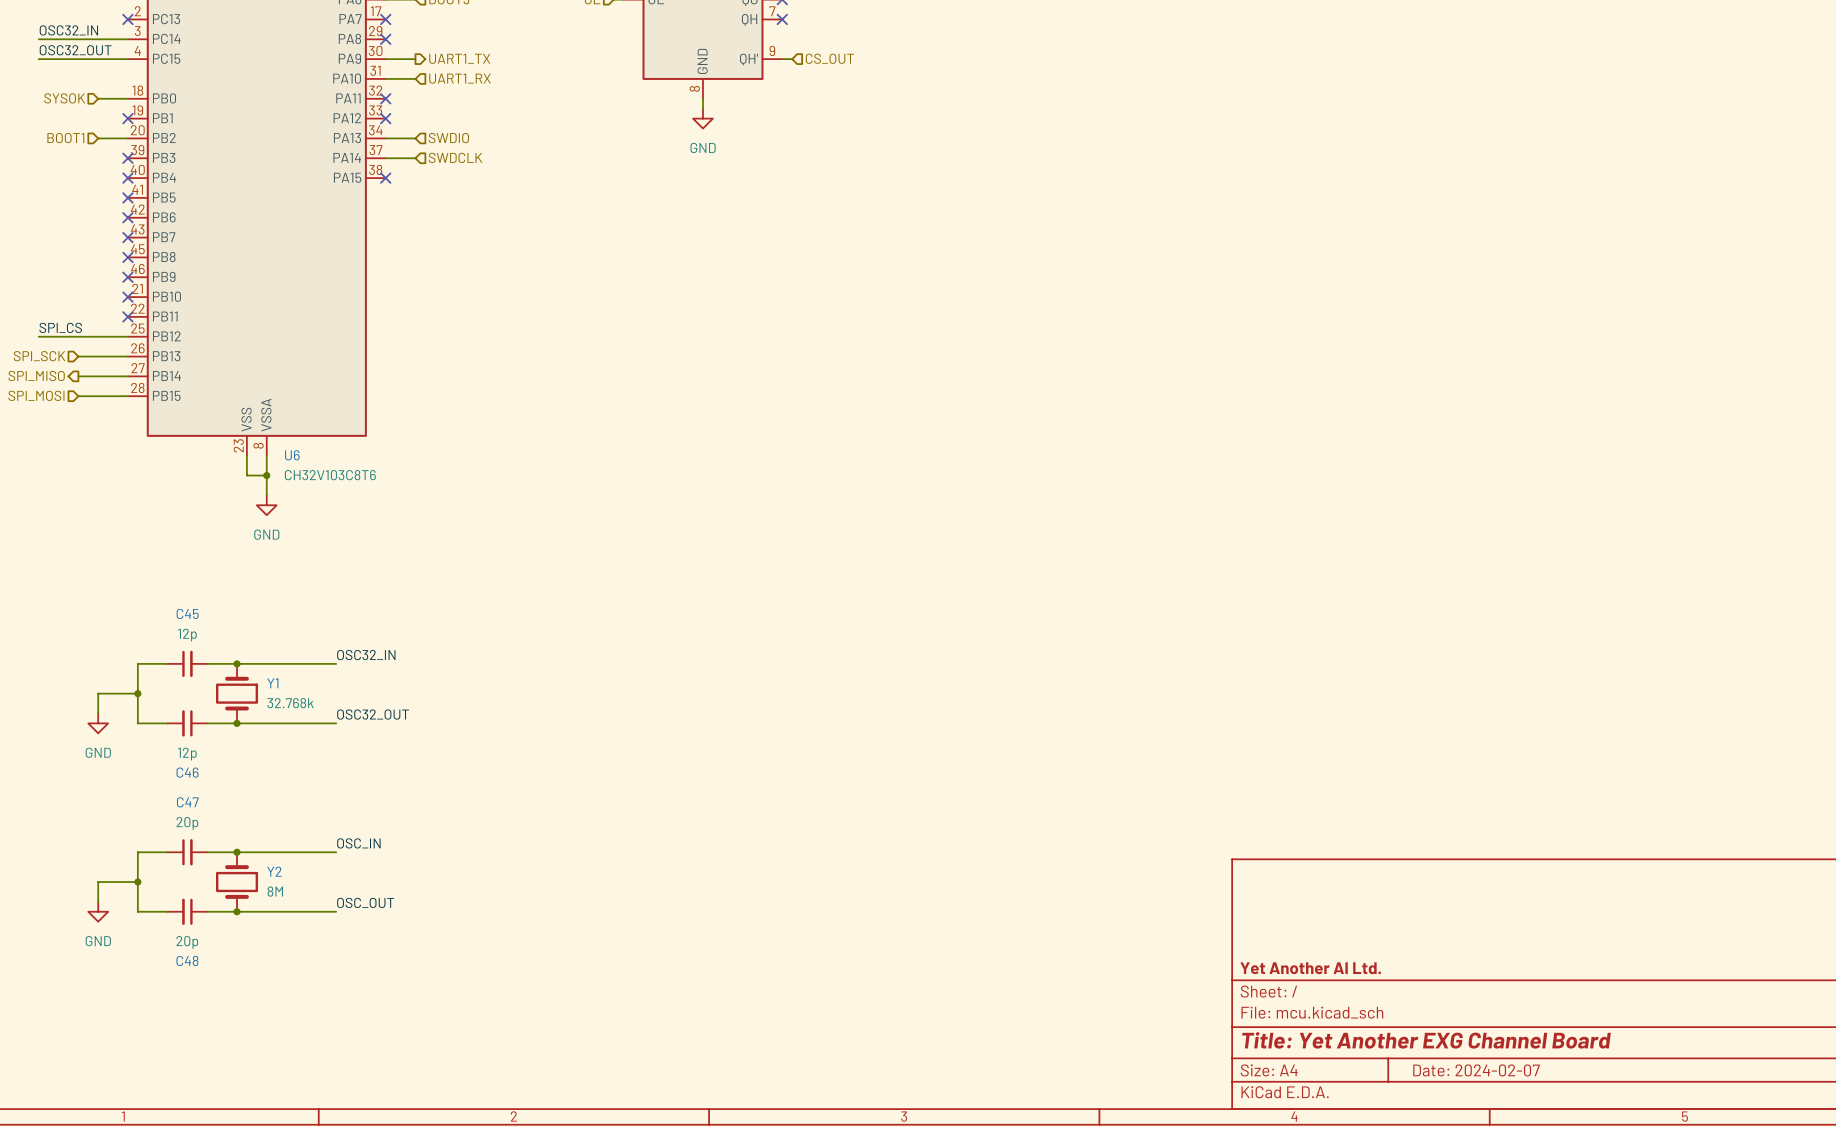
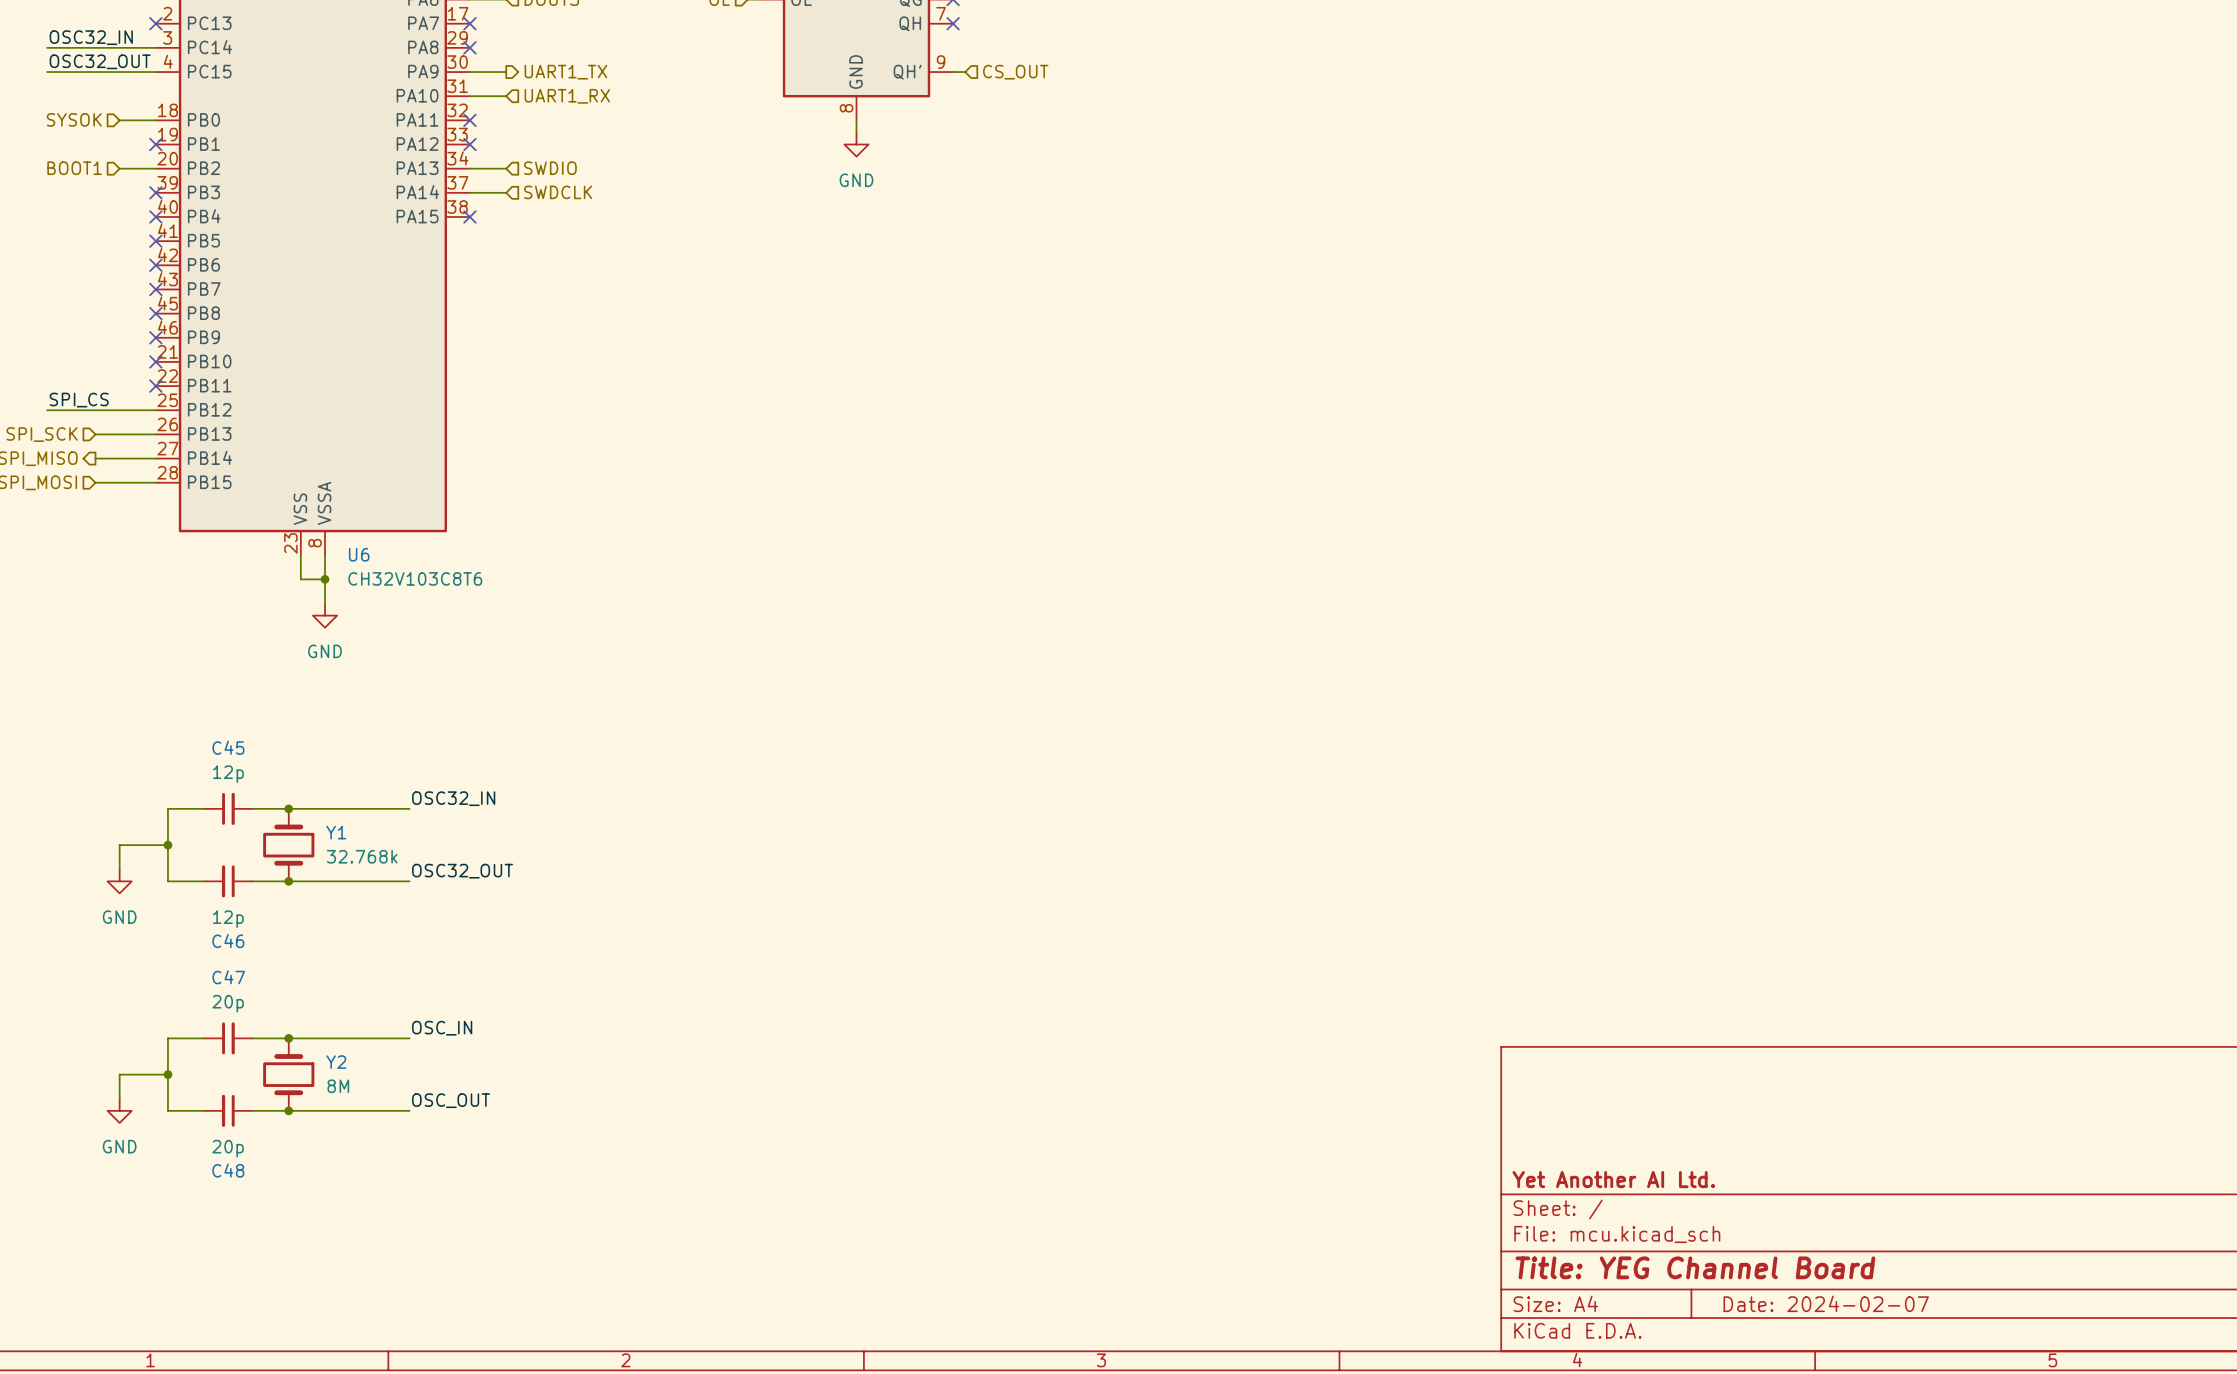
title block: Title: Yet Another EXG Channel Board (1426, 1040) -> Title: YEG Channel Board (1695, 1267)

